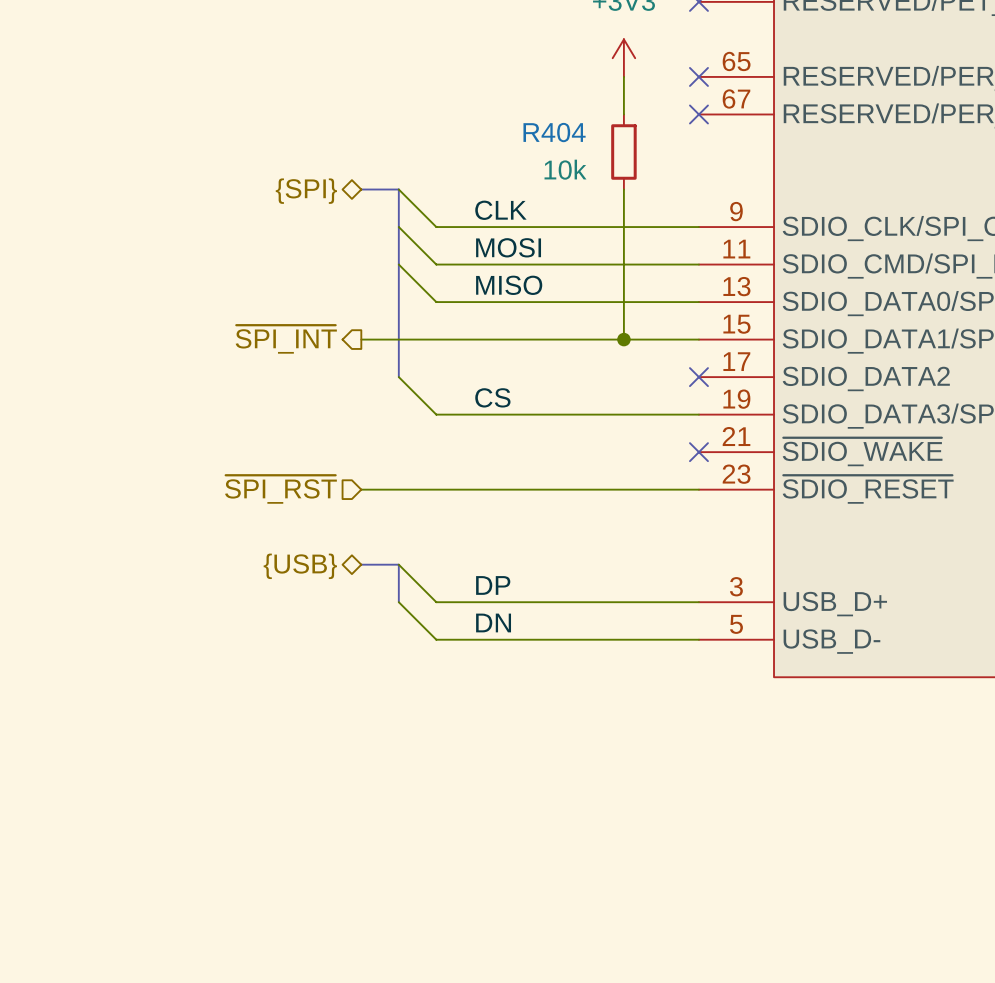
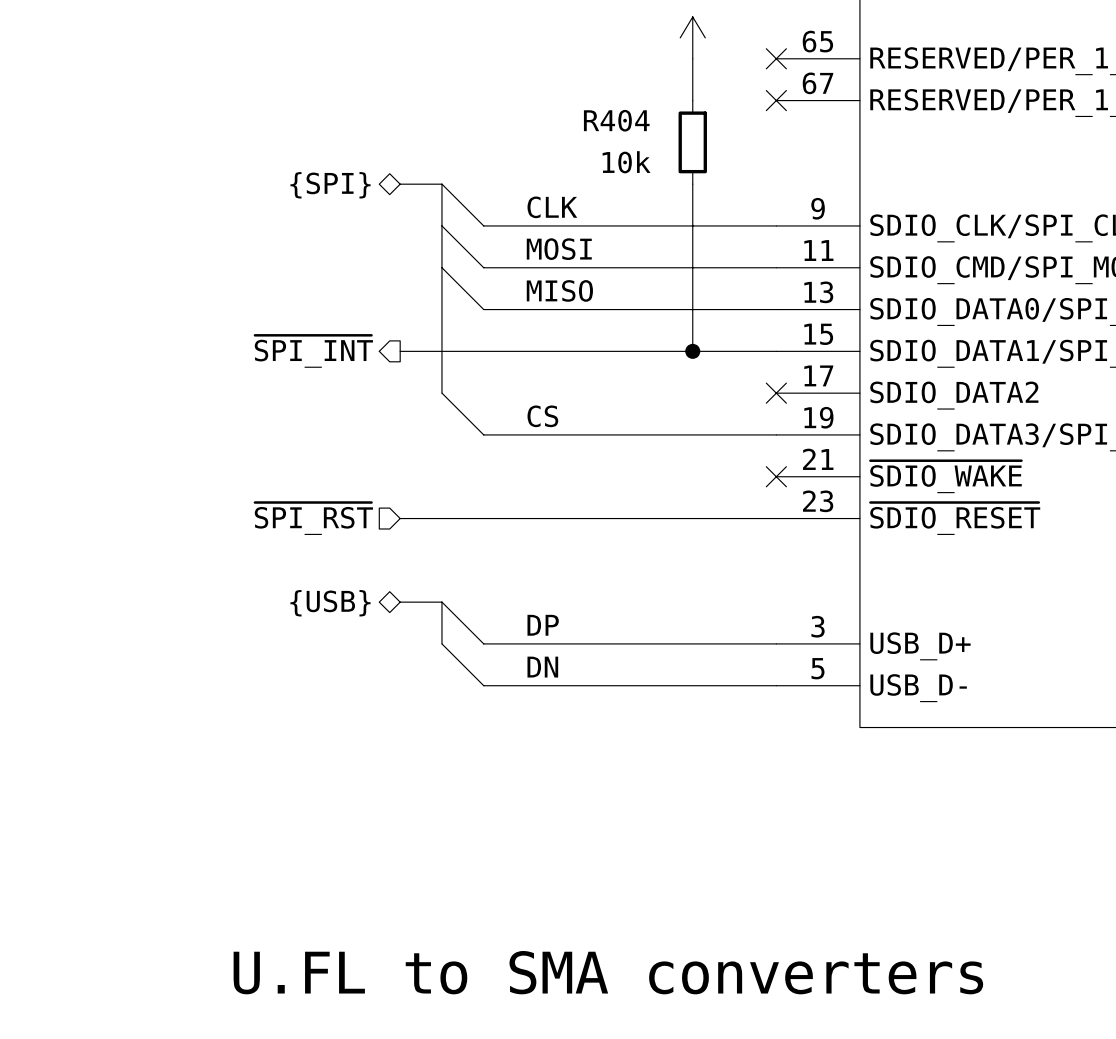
text: none -> U.FL to SMA converters (608, 972)

